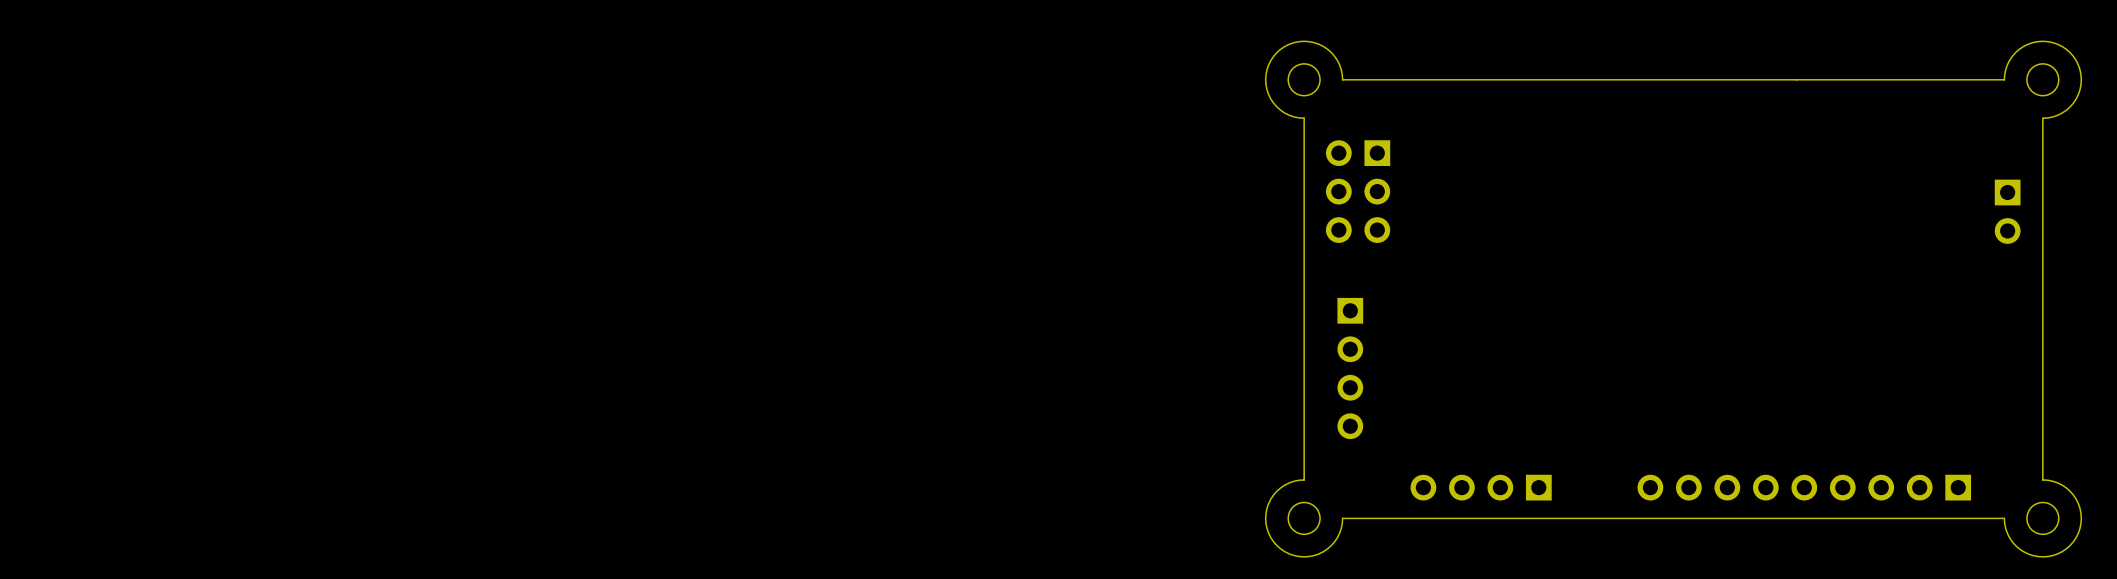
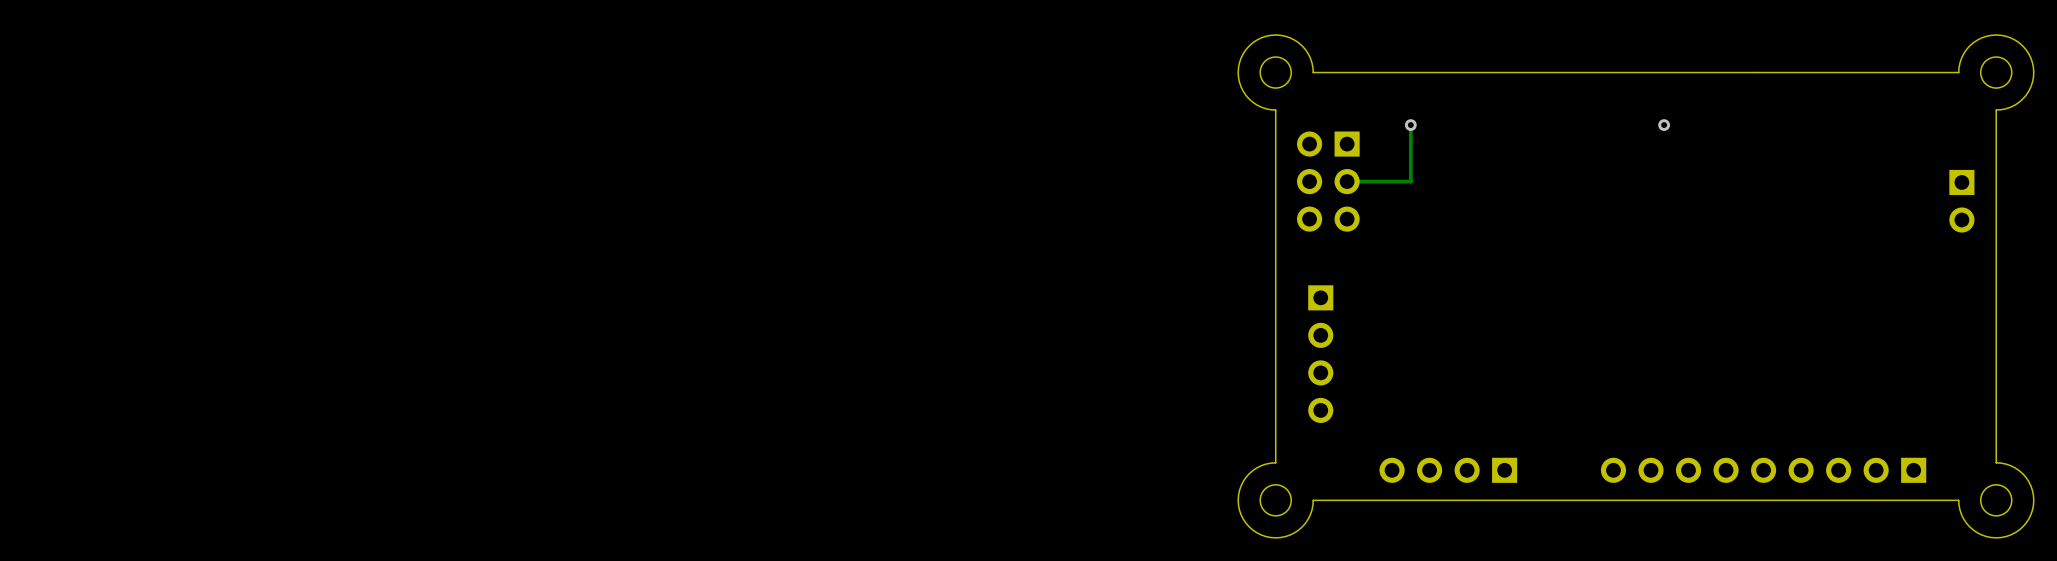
track: none -> (1410, 125) (1410, 181) (1347, 181)
via: none -> (1410, 125)
via: none -> (1664, 125)

